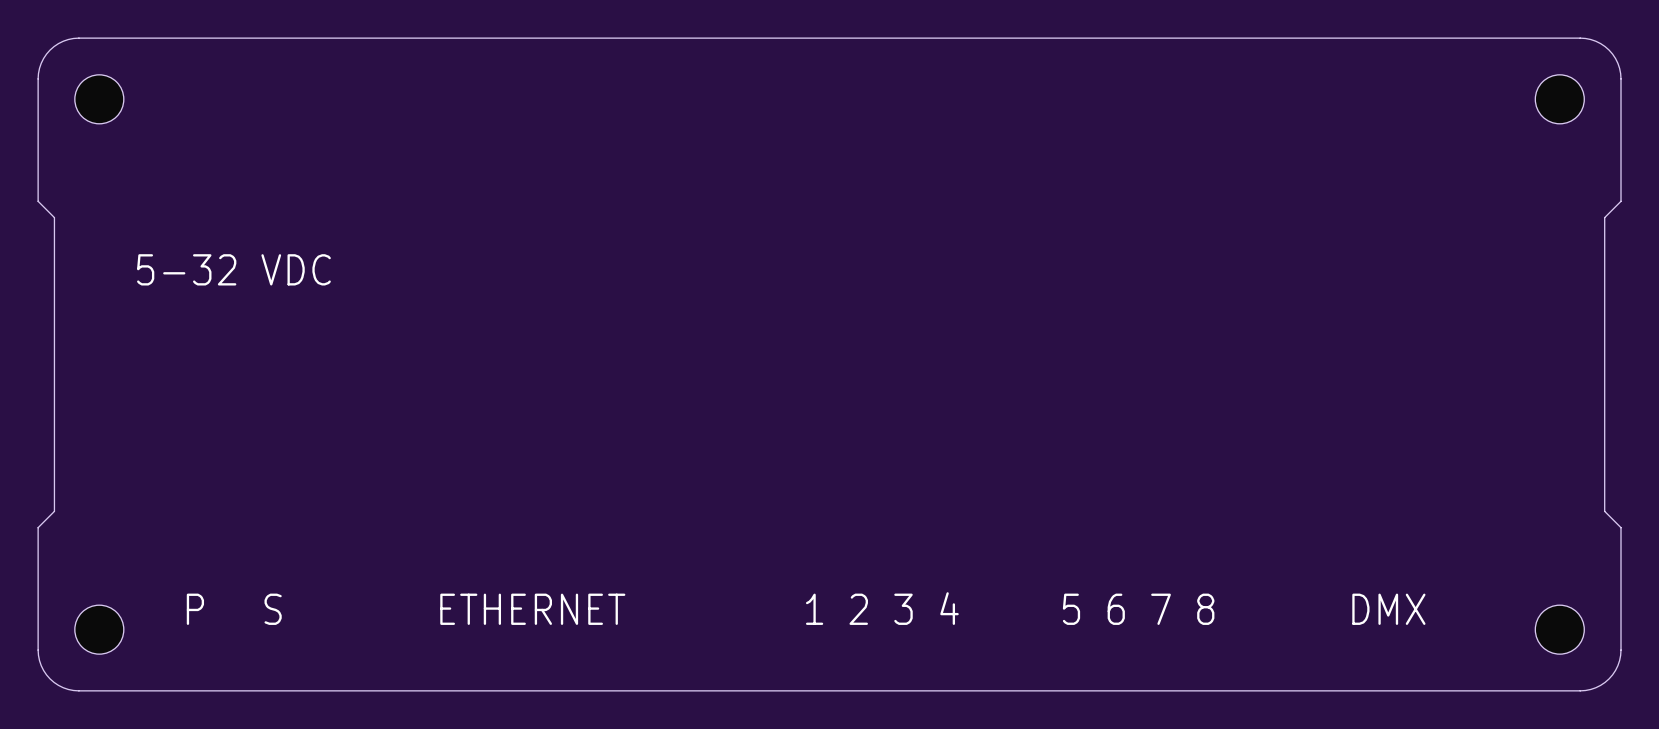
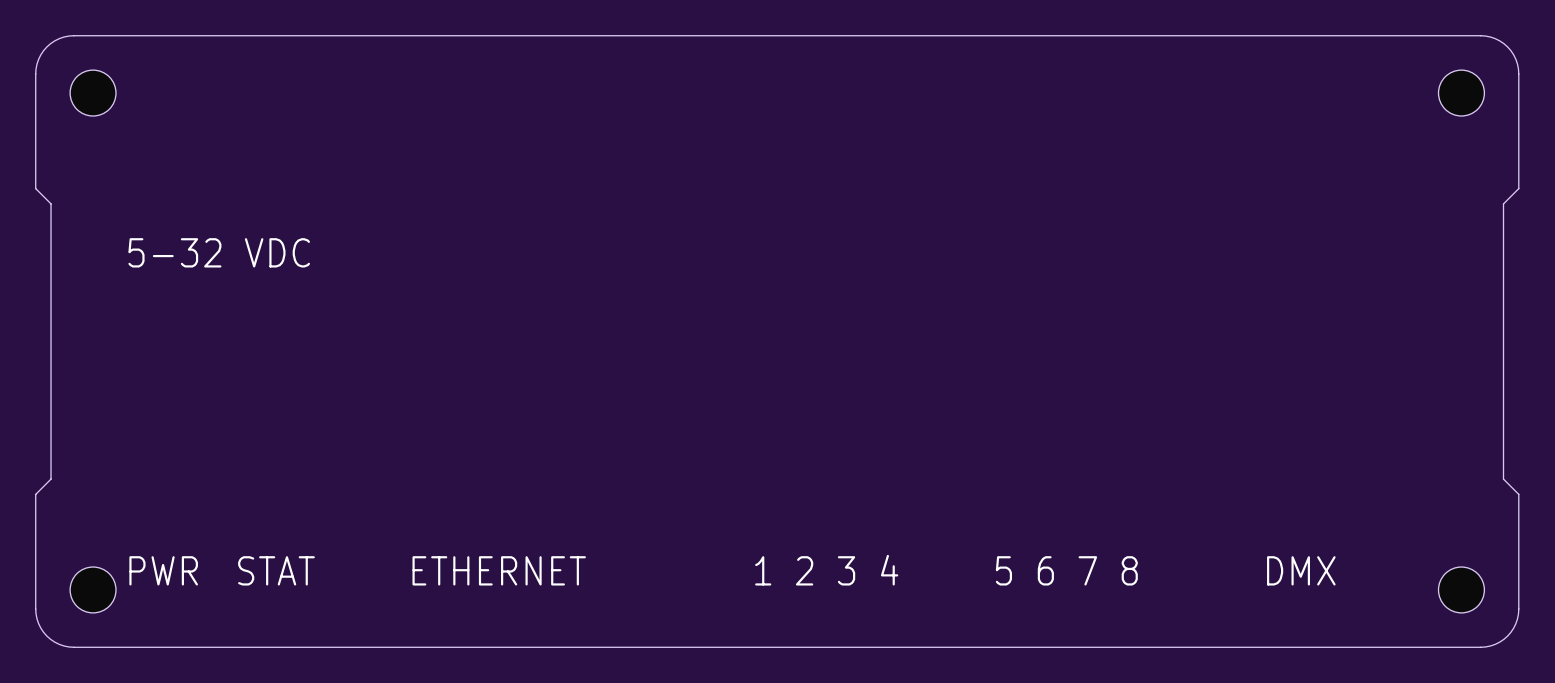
text: none -> PWR (163, 570)
text: P (195, 609) -> none
text: S (273, 609) -> none
text: none -> STAT (276, 570)

